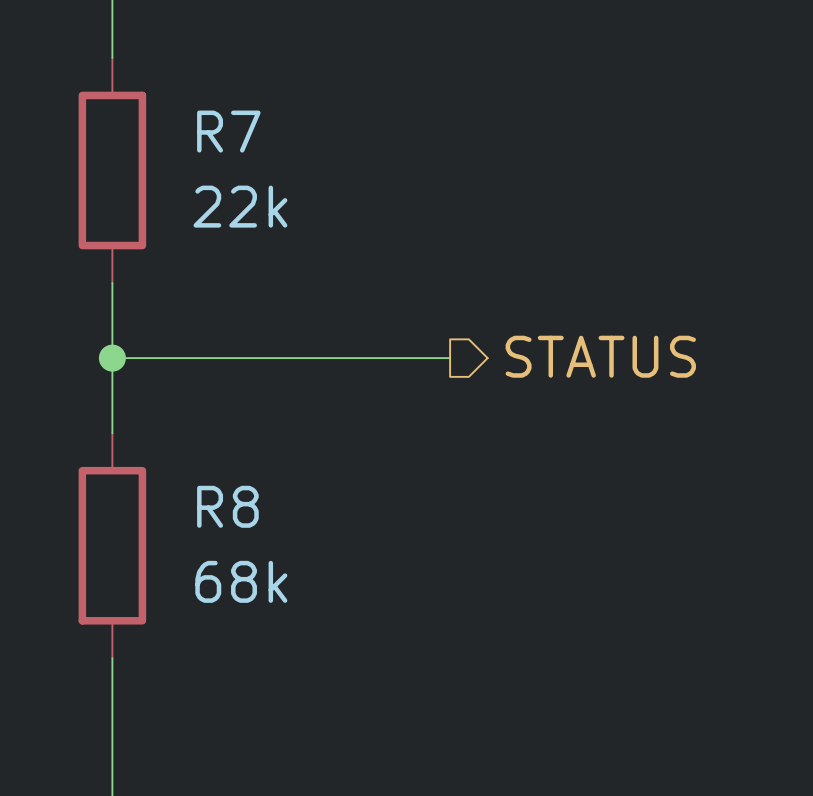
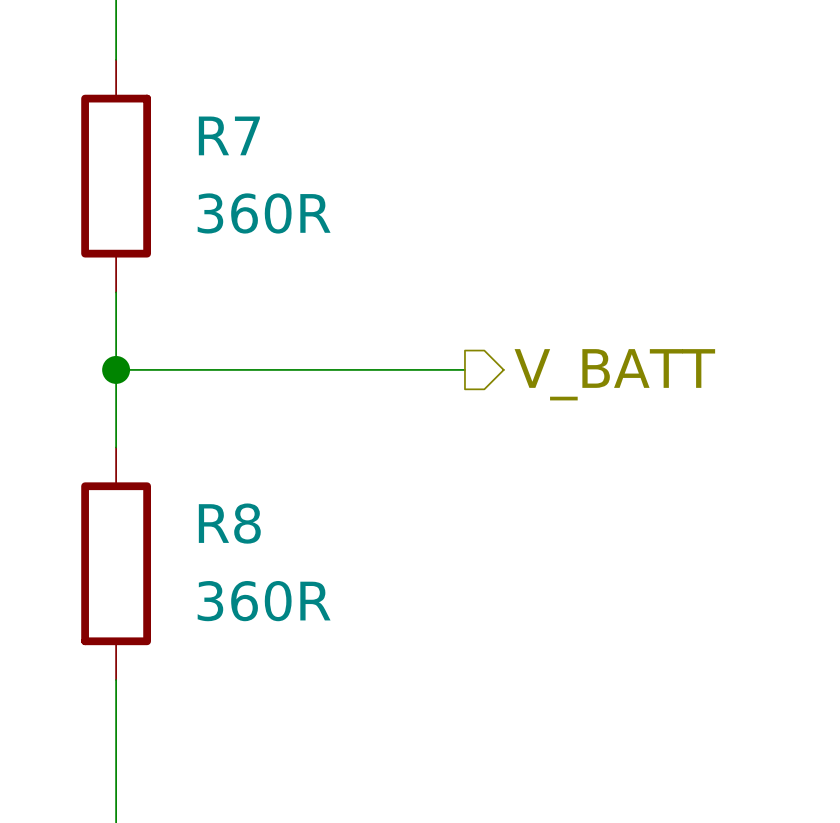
R7 value: 22k (240, 206) -> 360R (264, 213)
hierarchical label: STATUS (600, 356) -> V_BATT (614, 374)
R8 value: 68k (241, 581) -> 360R (264, 601)

